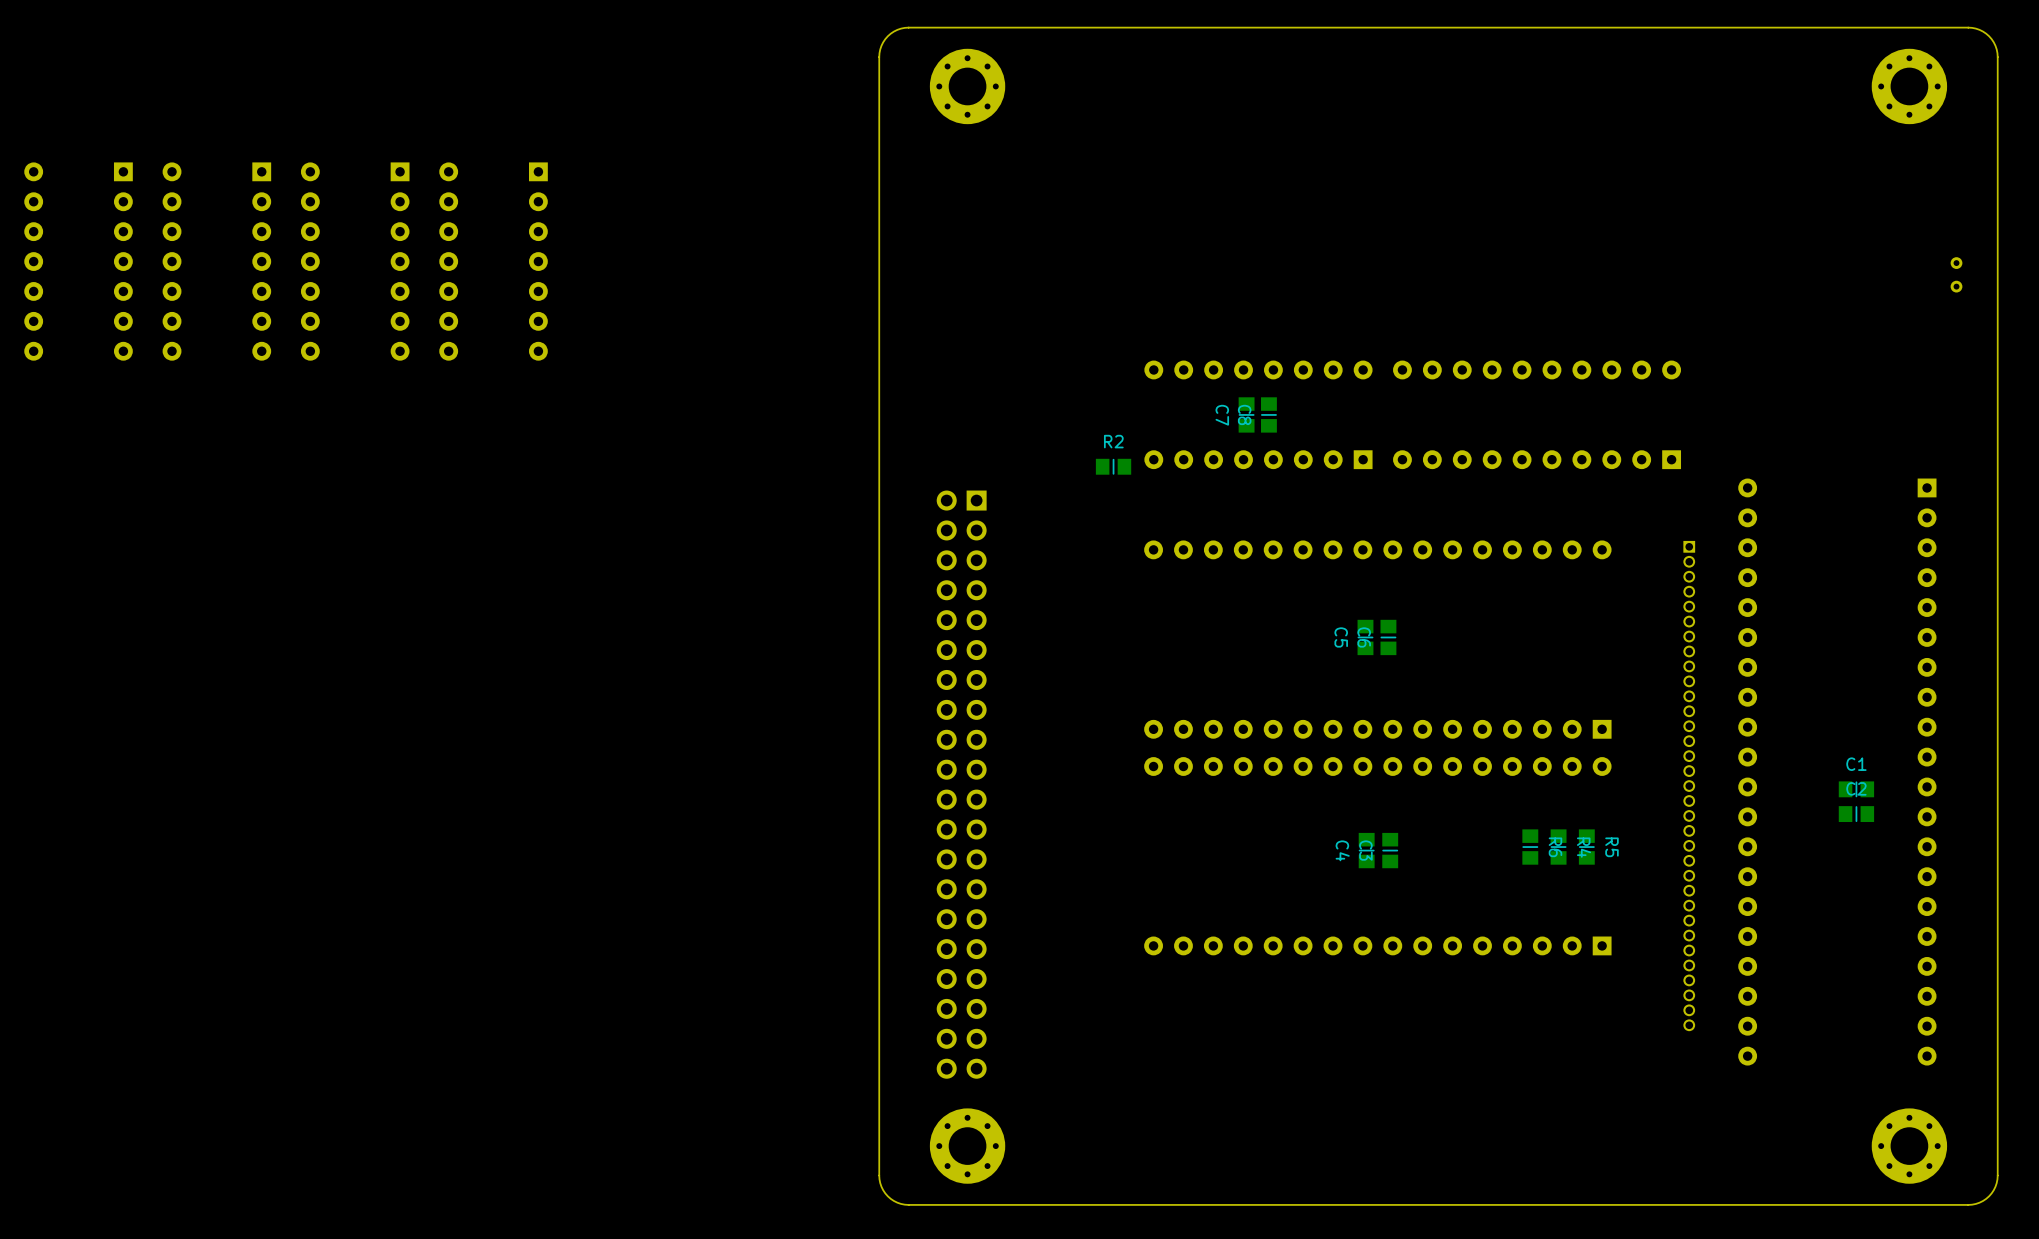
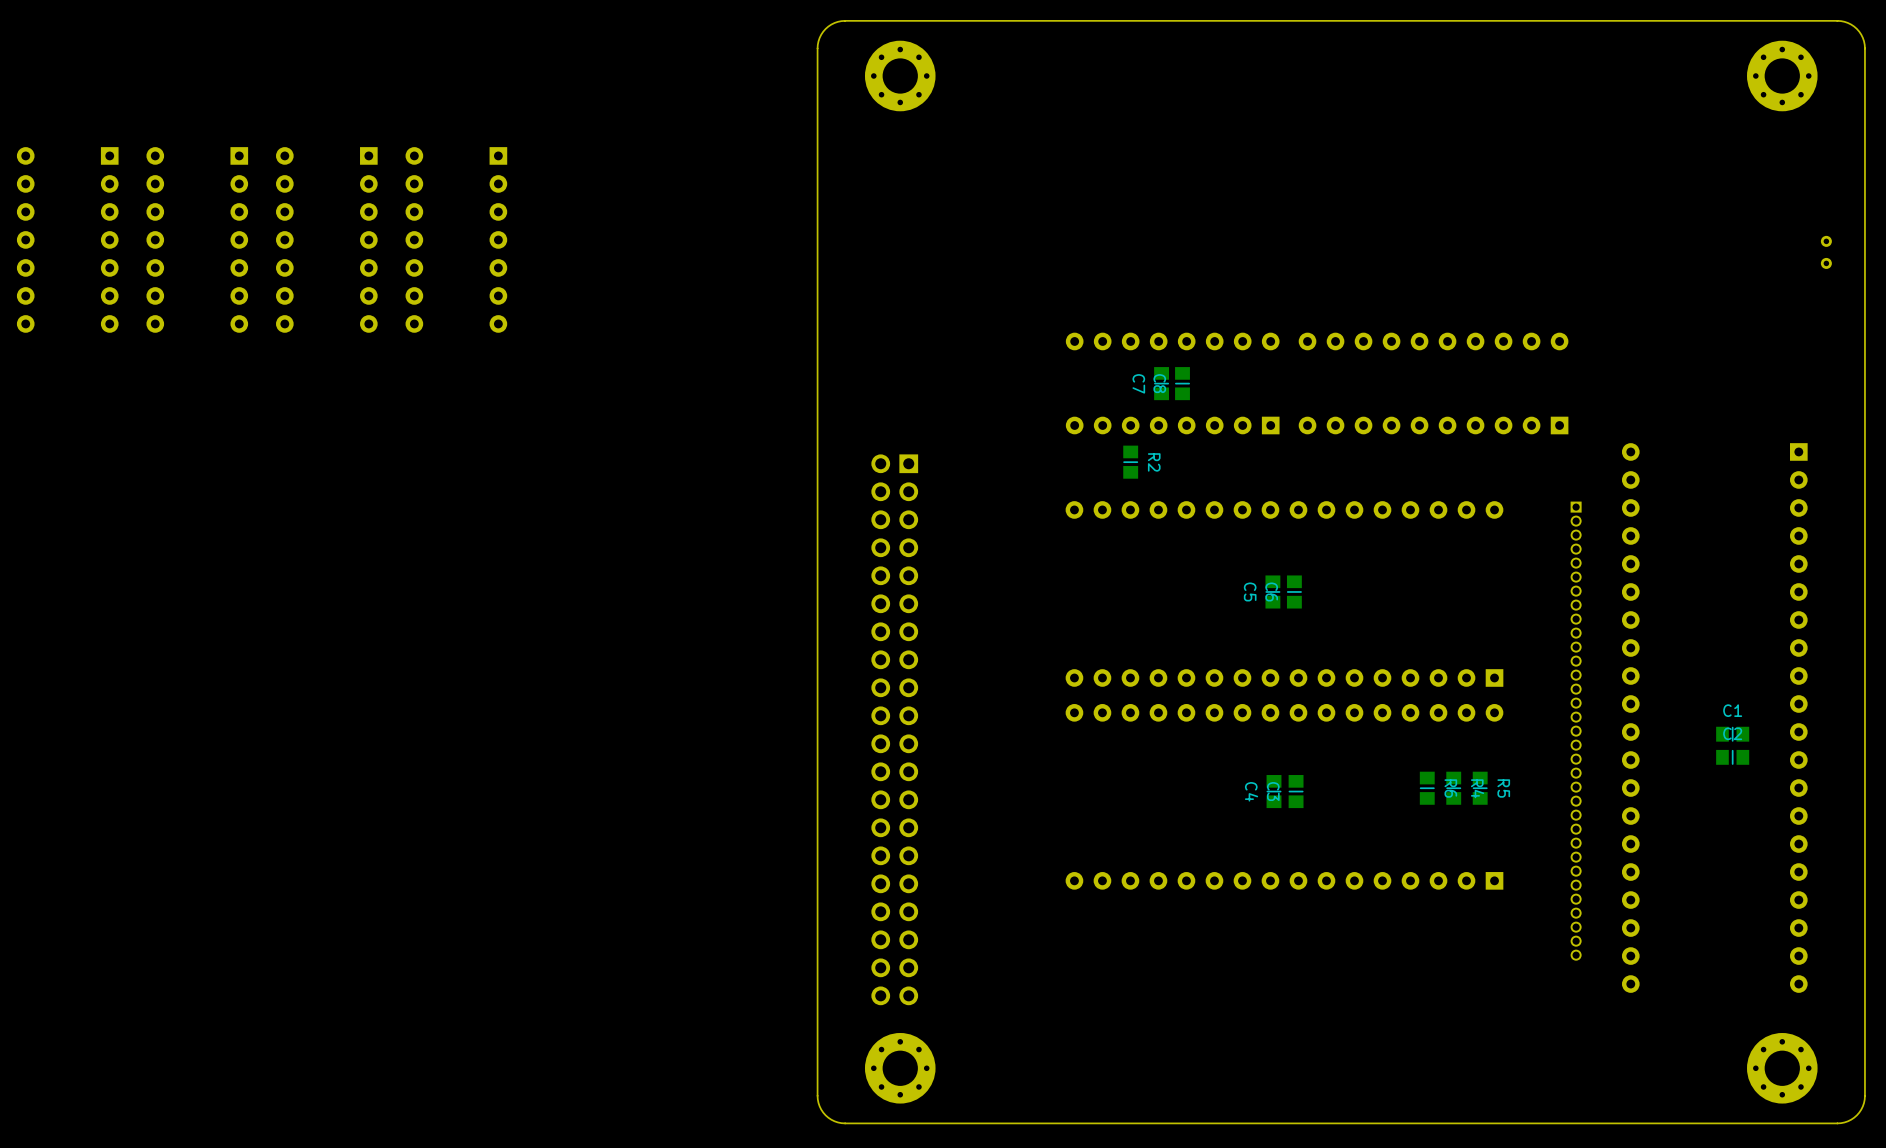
R2 rotation: 0° (1113, 466) -> 90° clockwise (1130, 462)
R2 position: (1113, 466) -> (1130, 462)

